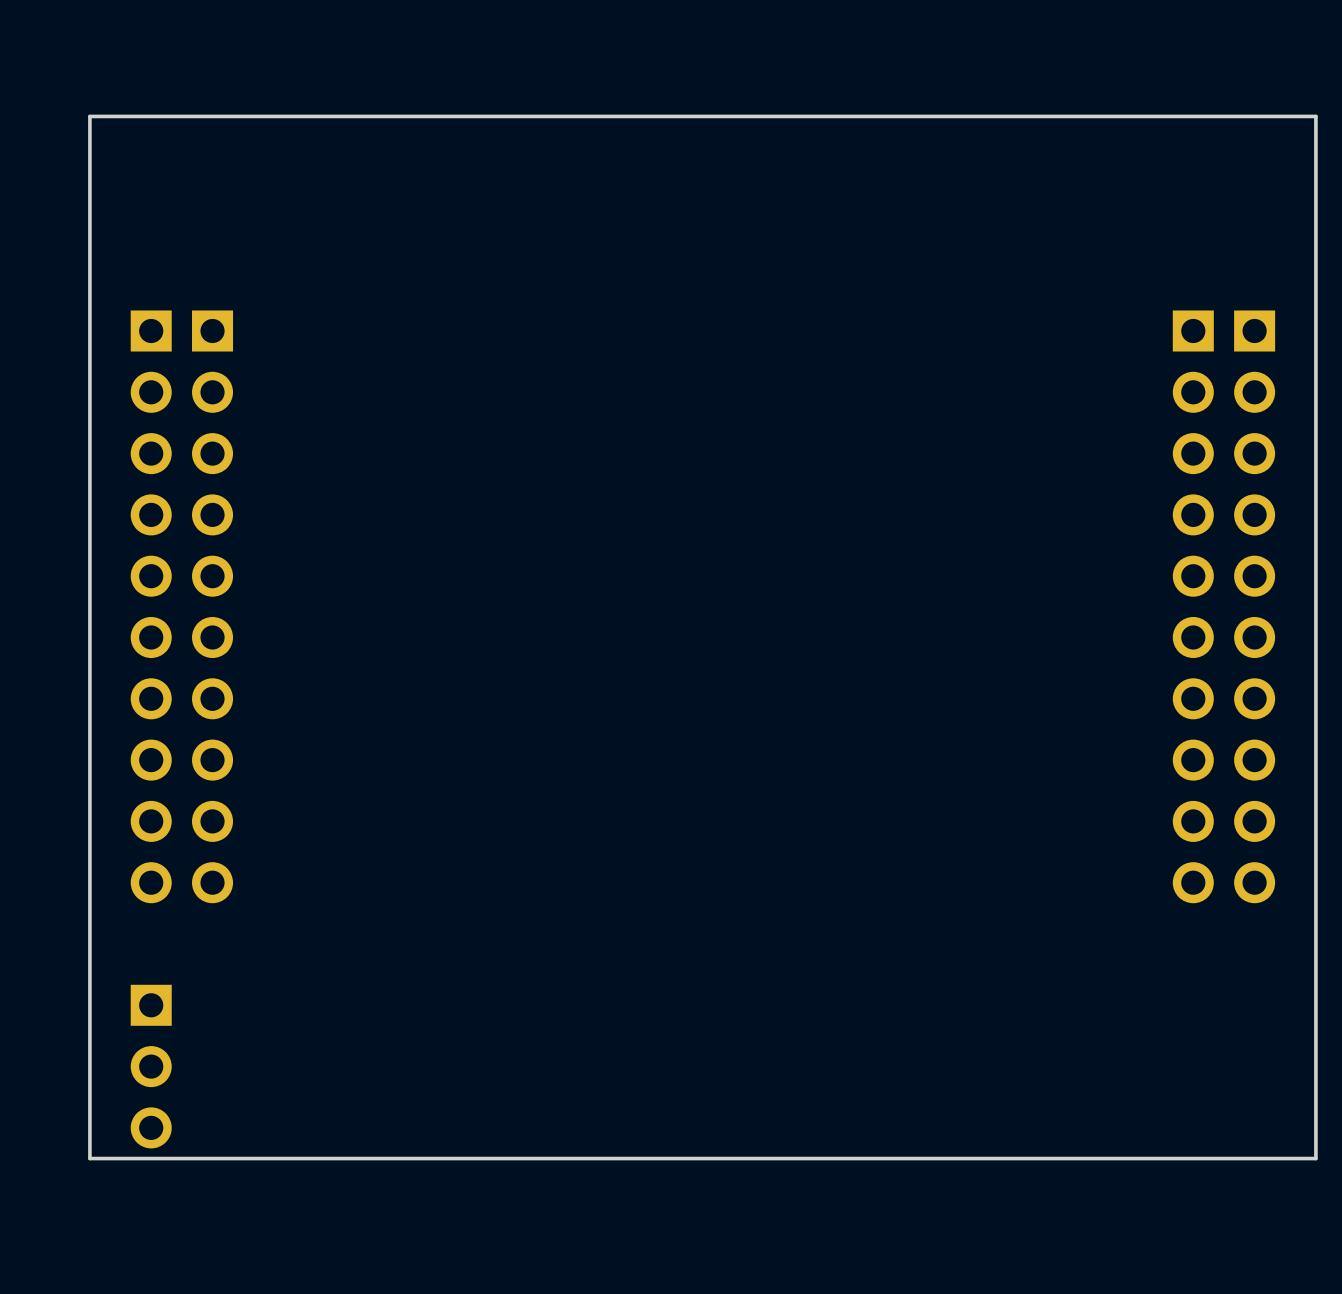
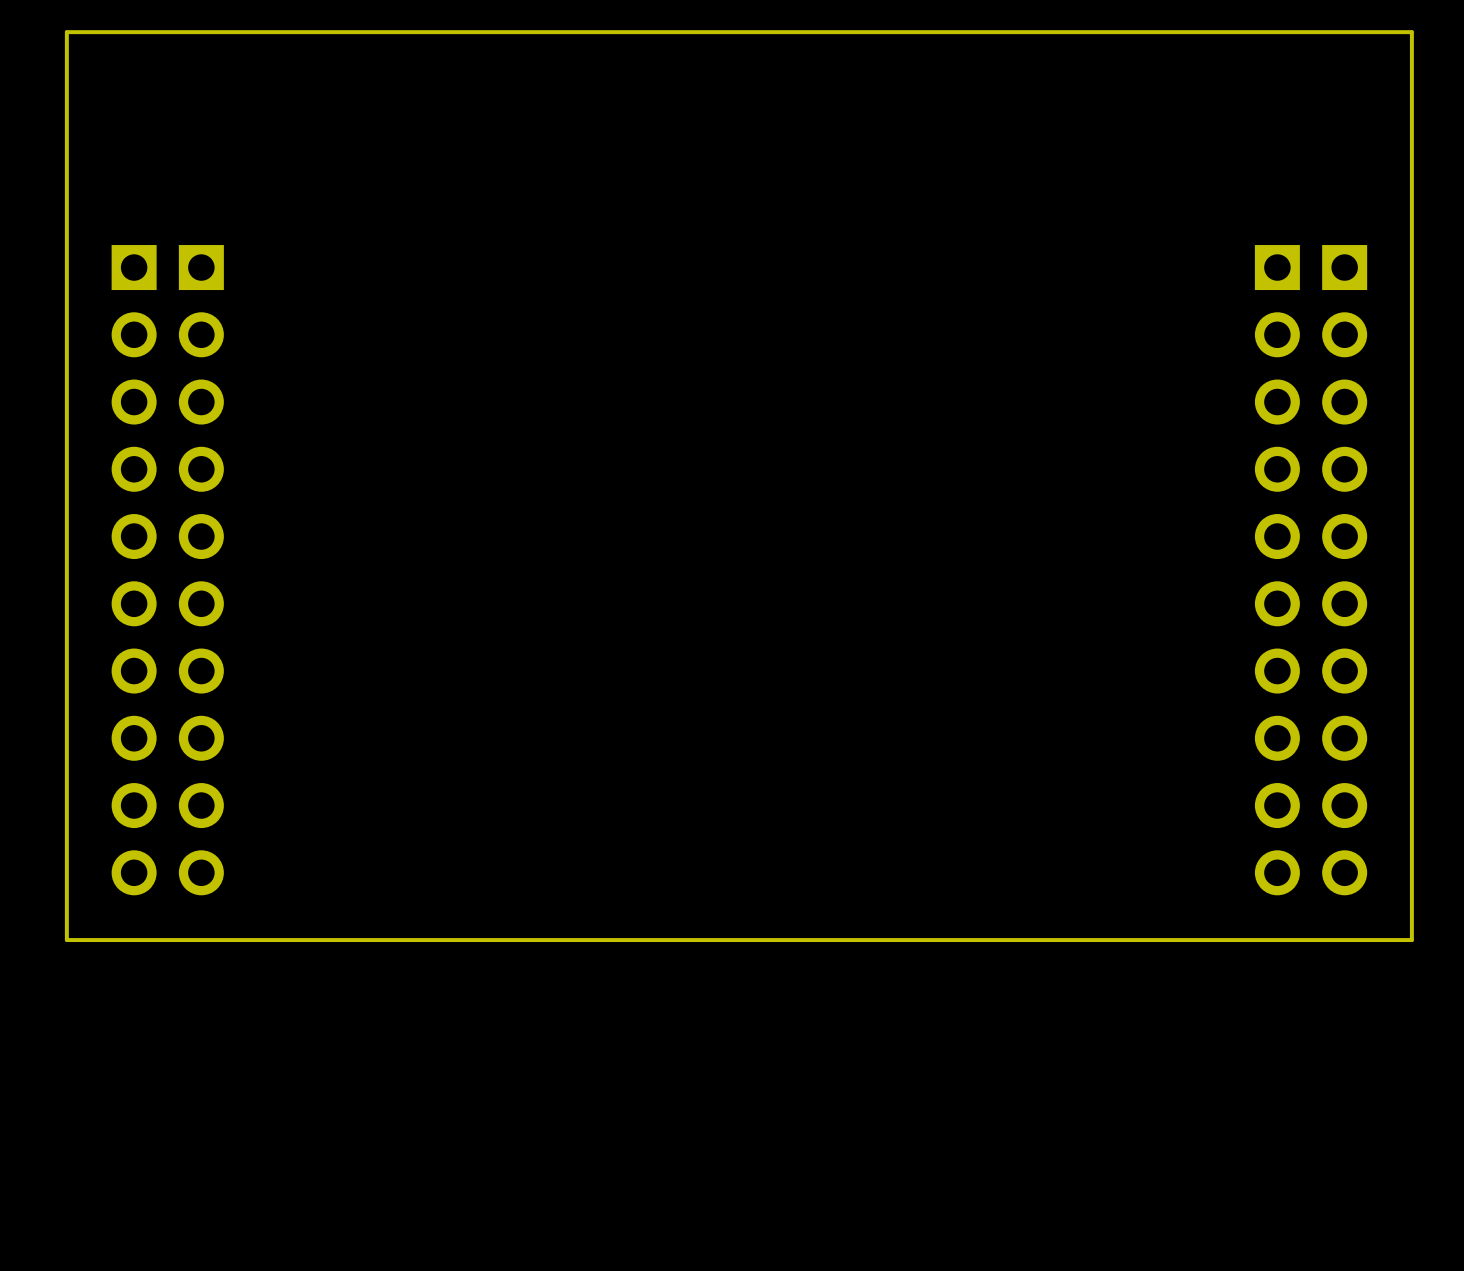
board edge: (1315, 944) (1315, 1158) (89, 1158) (89, 944) -> (1411, 940) (66, 940)
part: (151, 1066) -> none

